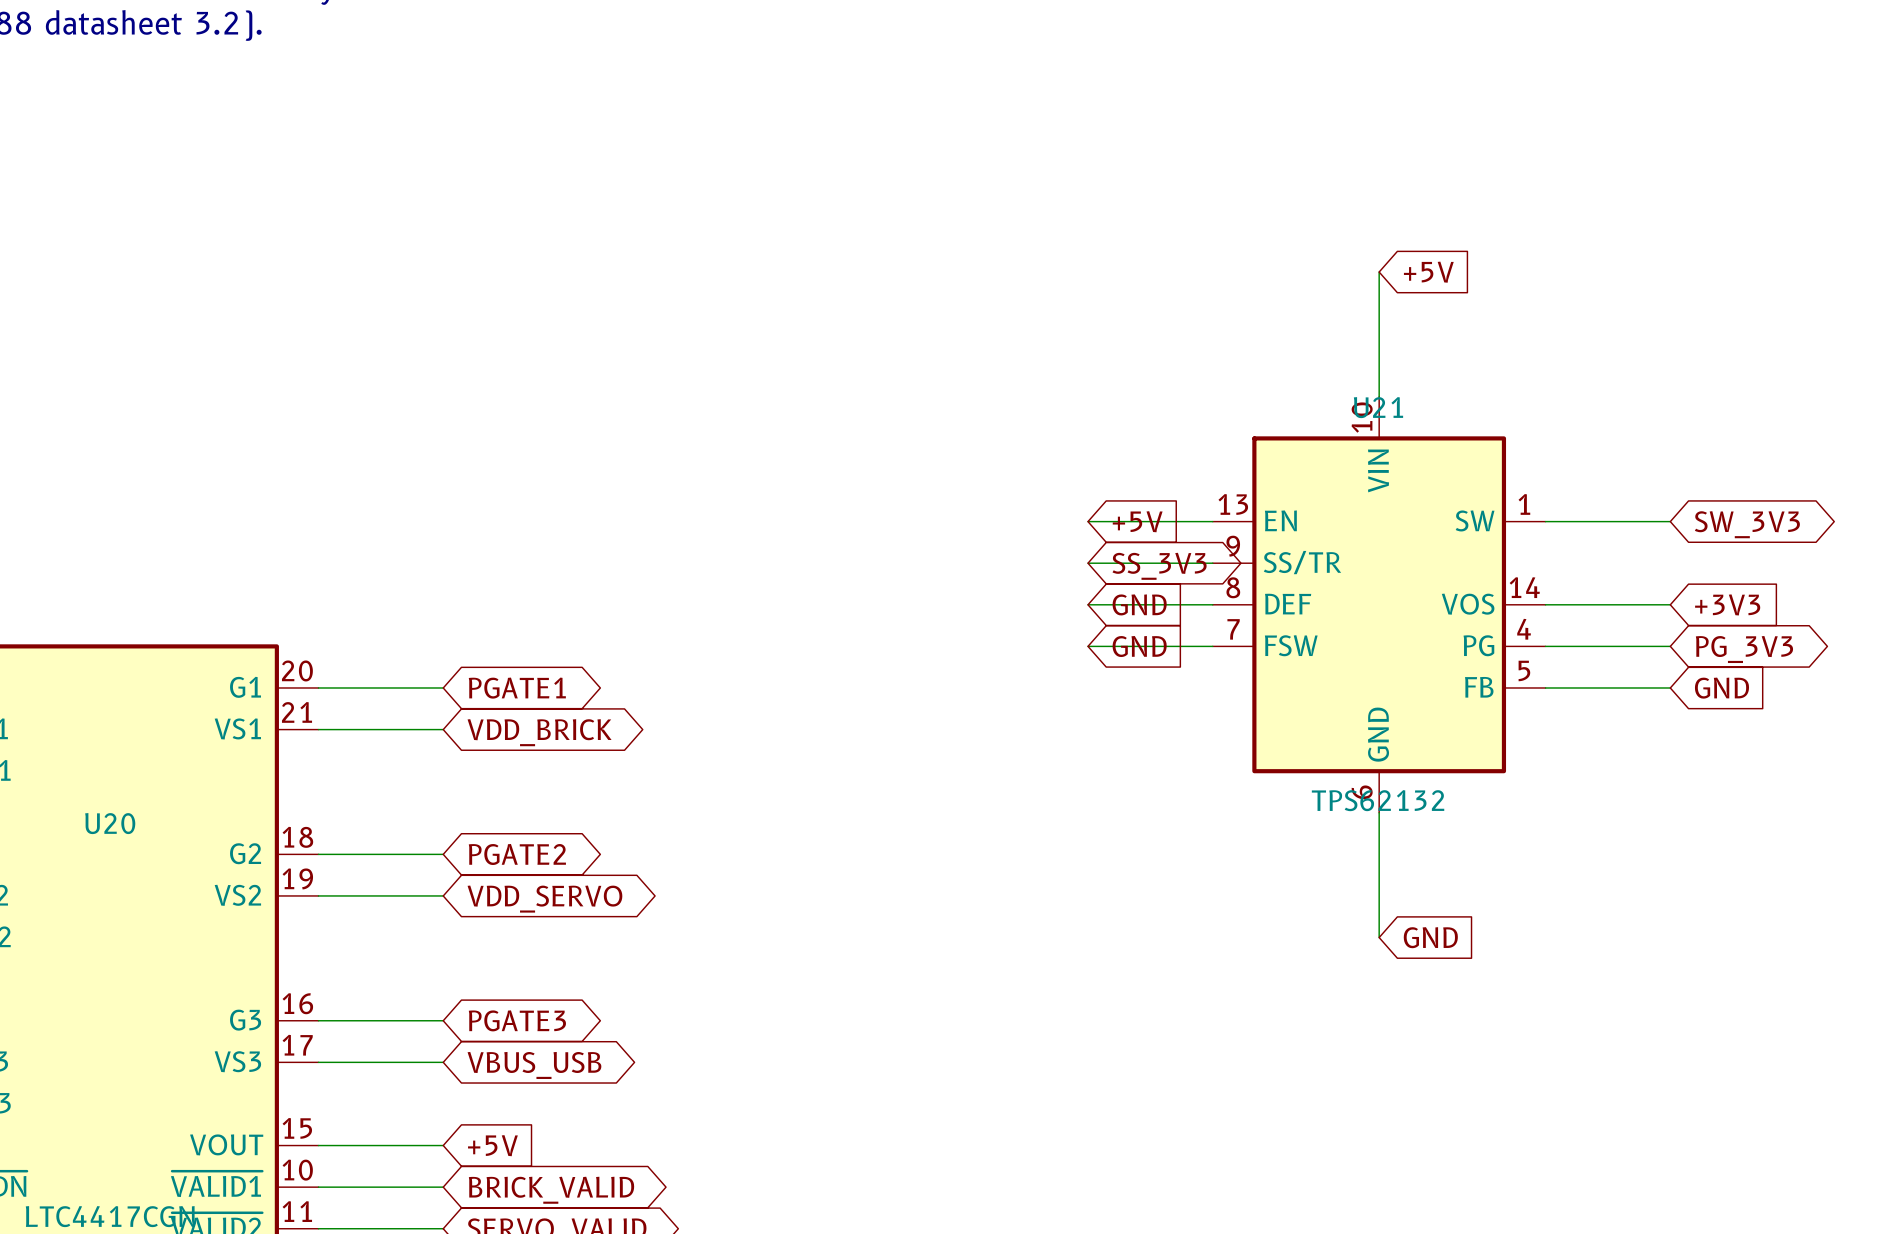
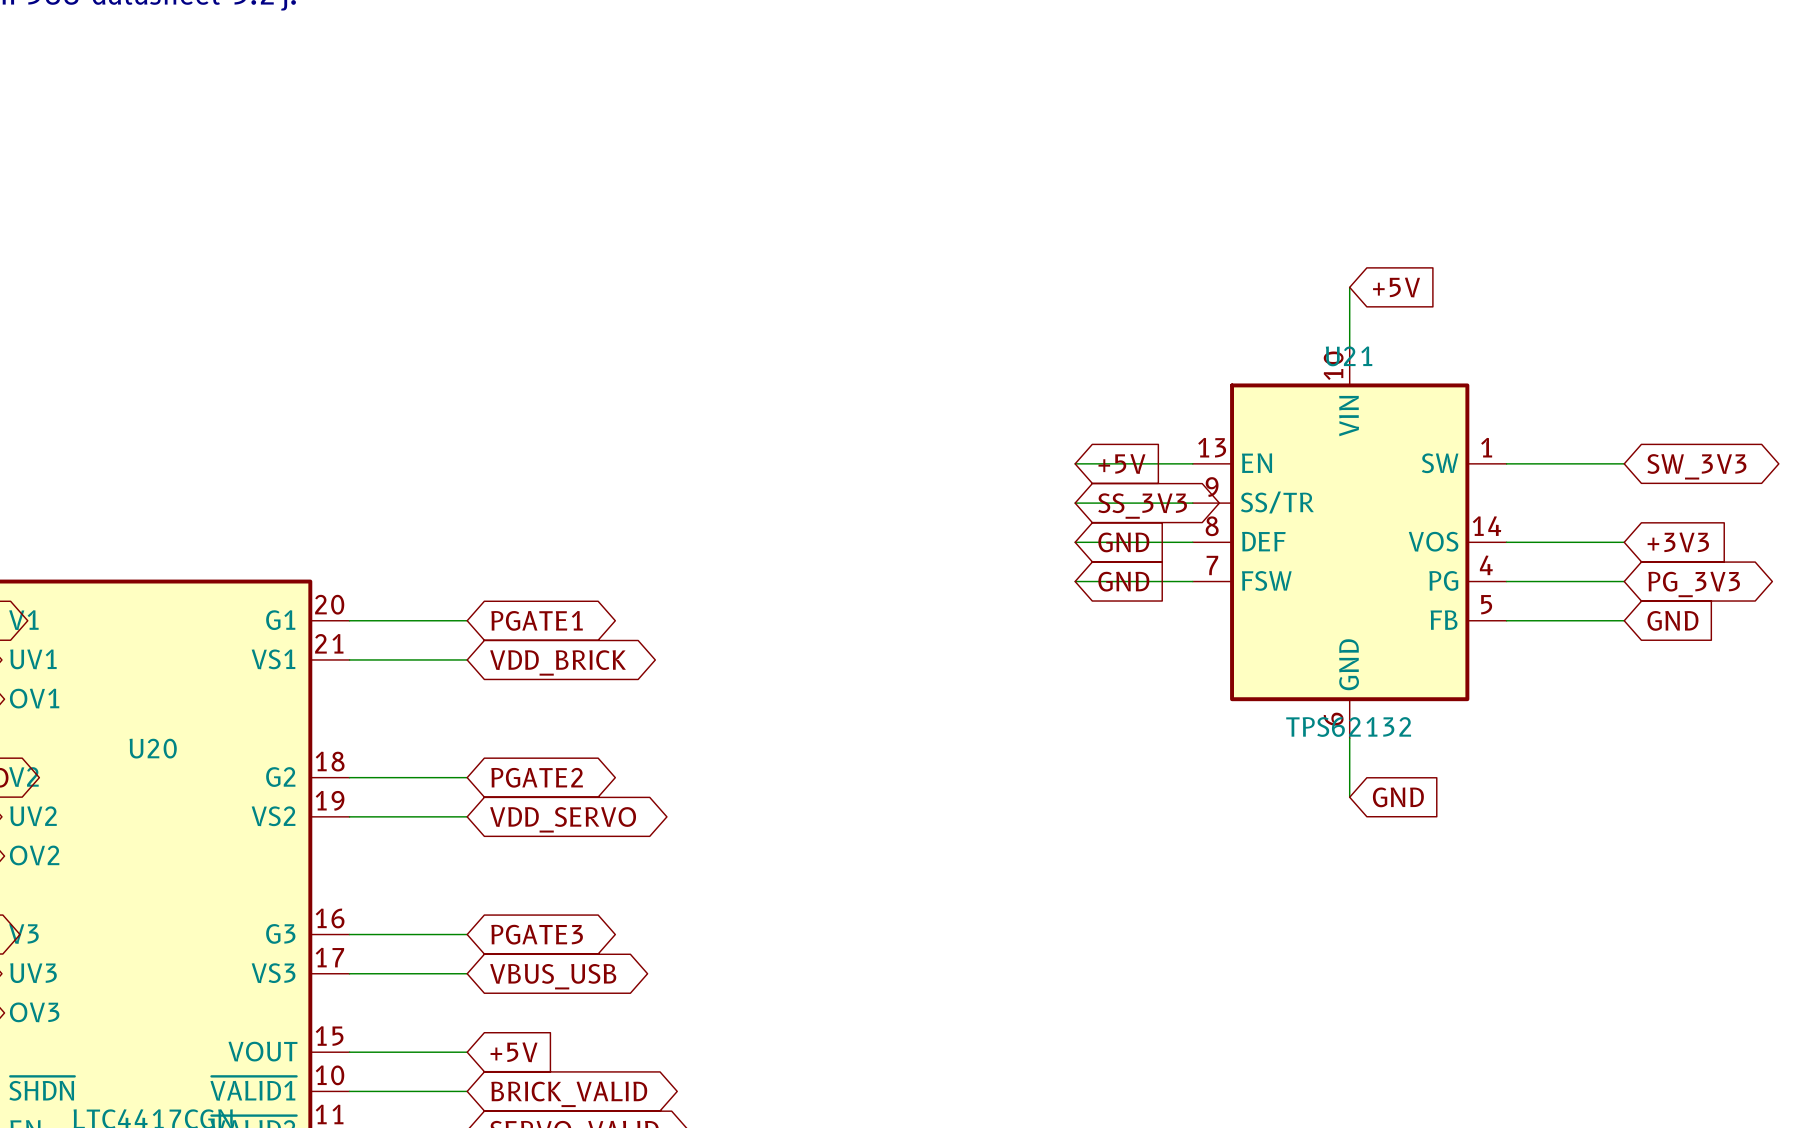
wire: (1379, 272) (1379, 334) -> none
global label position: +5V (1428, 272) -> +5V (1396, 287)
wire: (1379, 875) (1379, 937) -> none
global label position: GND (1430, 937) -> GND (1398, 797)

